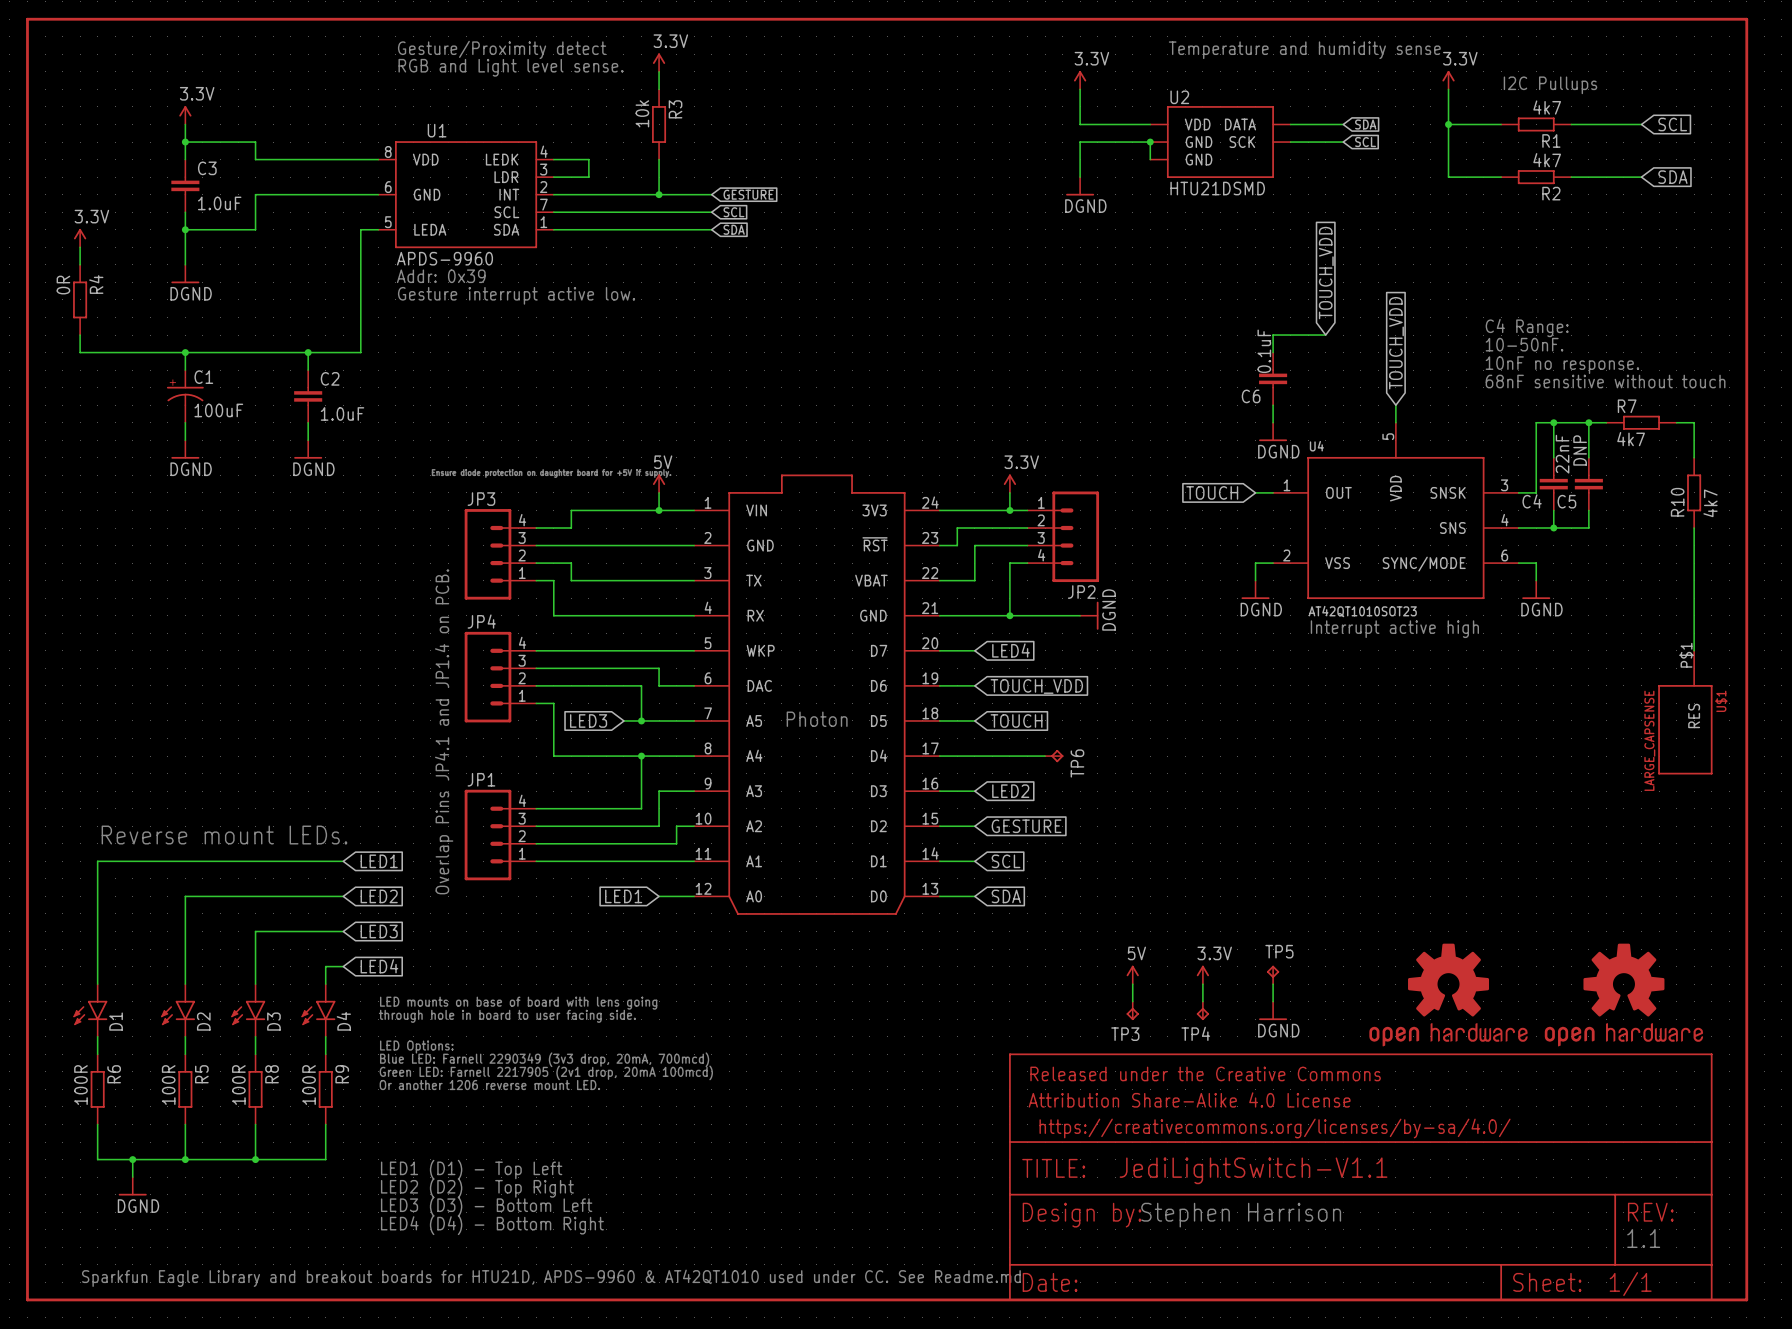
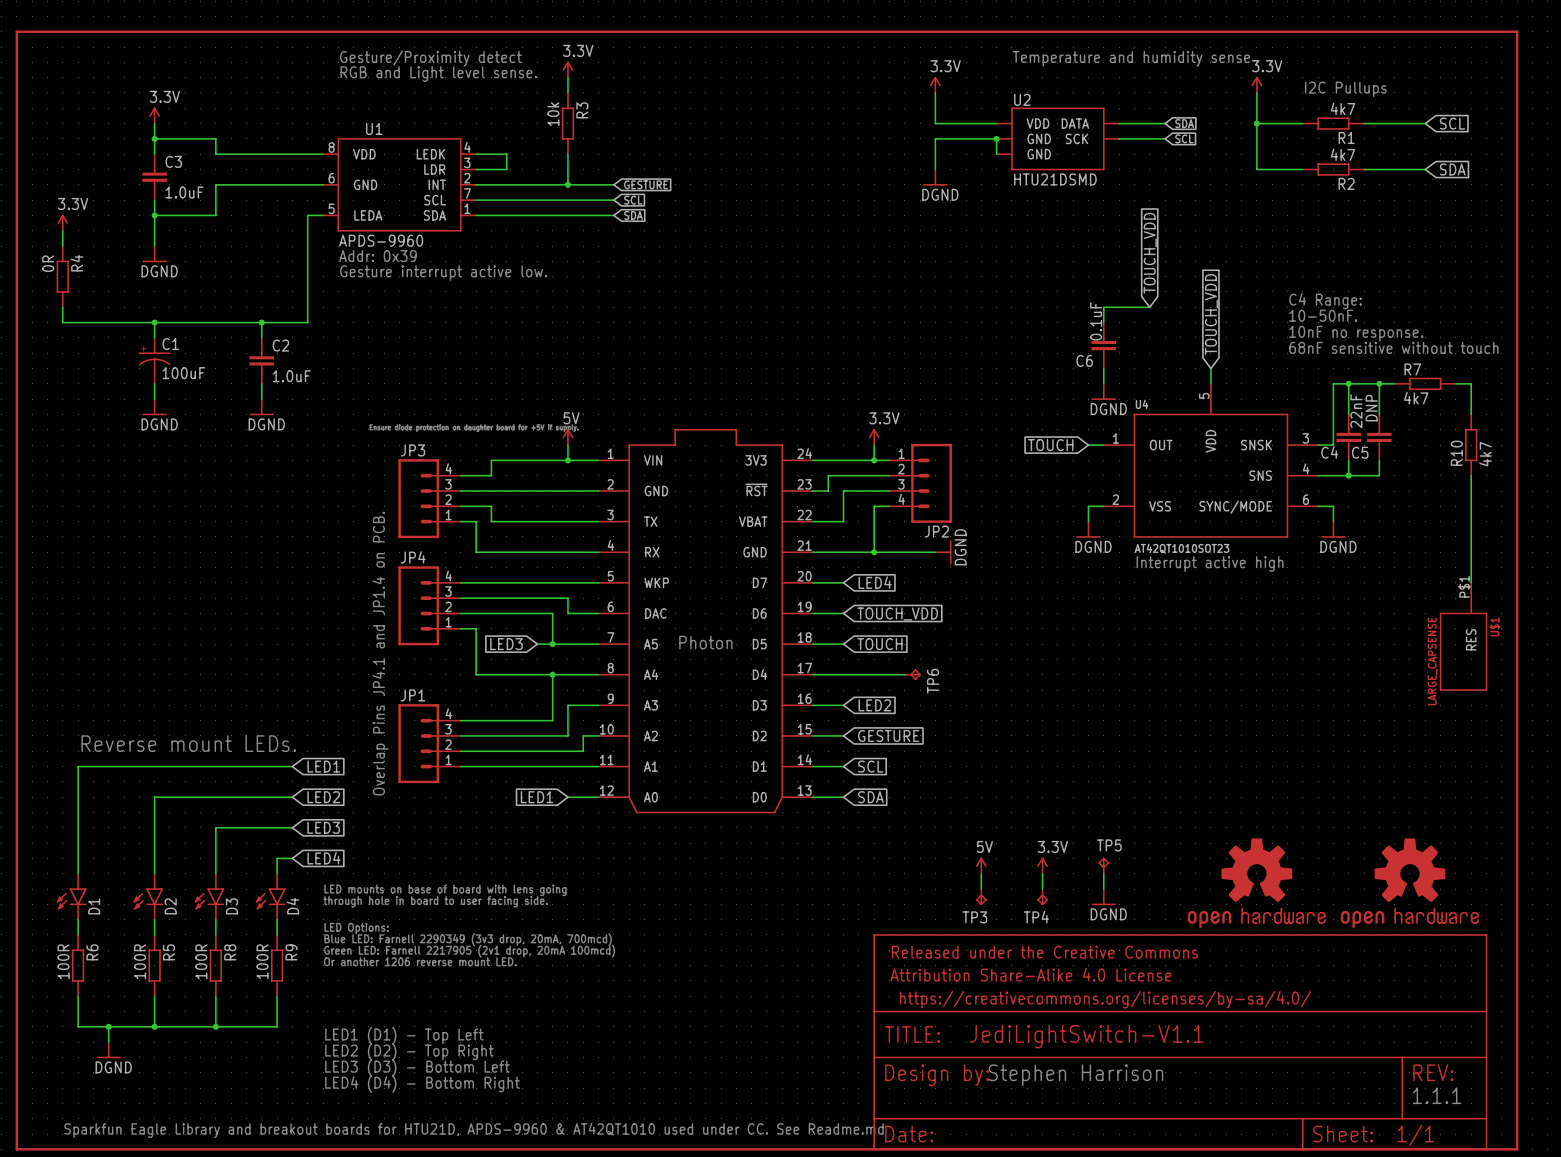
text: 1.1 (1643, 1238) -> 1.1.1 (1437, 1095)

